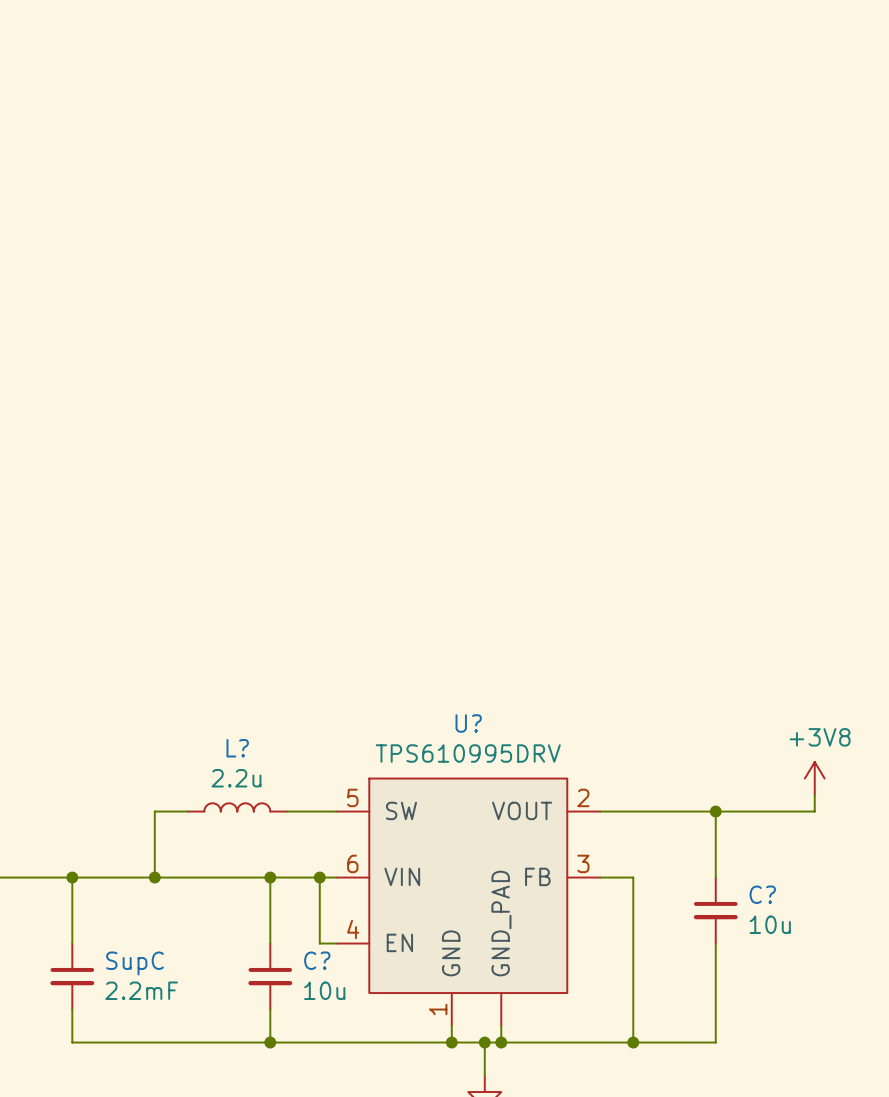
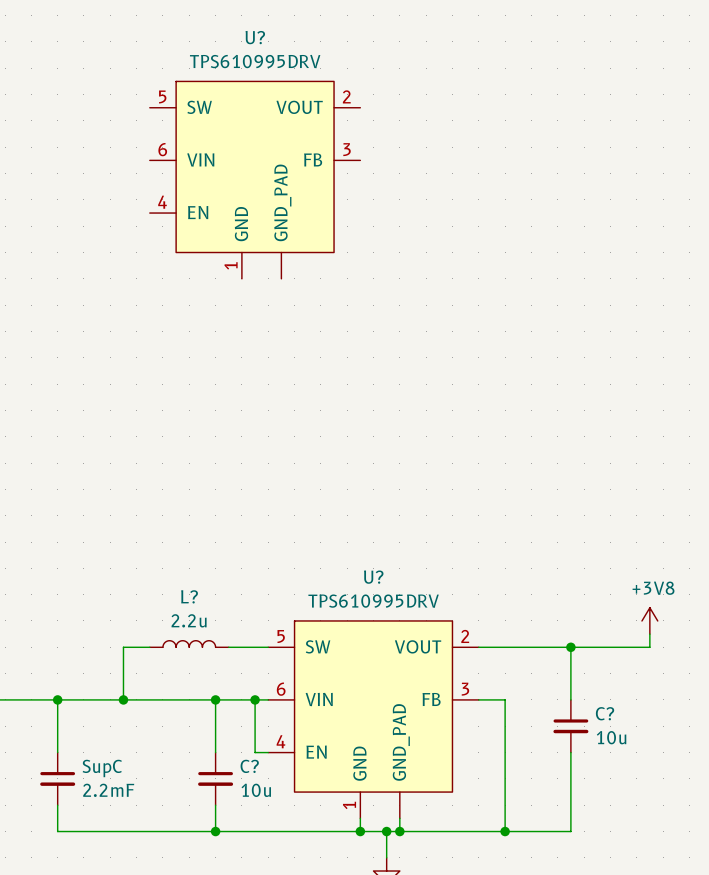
U?: none -> TPS610995DRV (255, 180)

